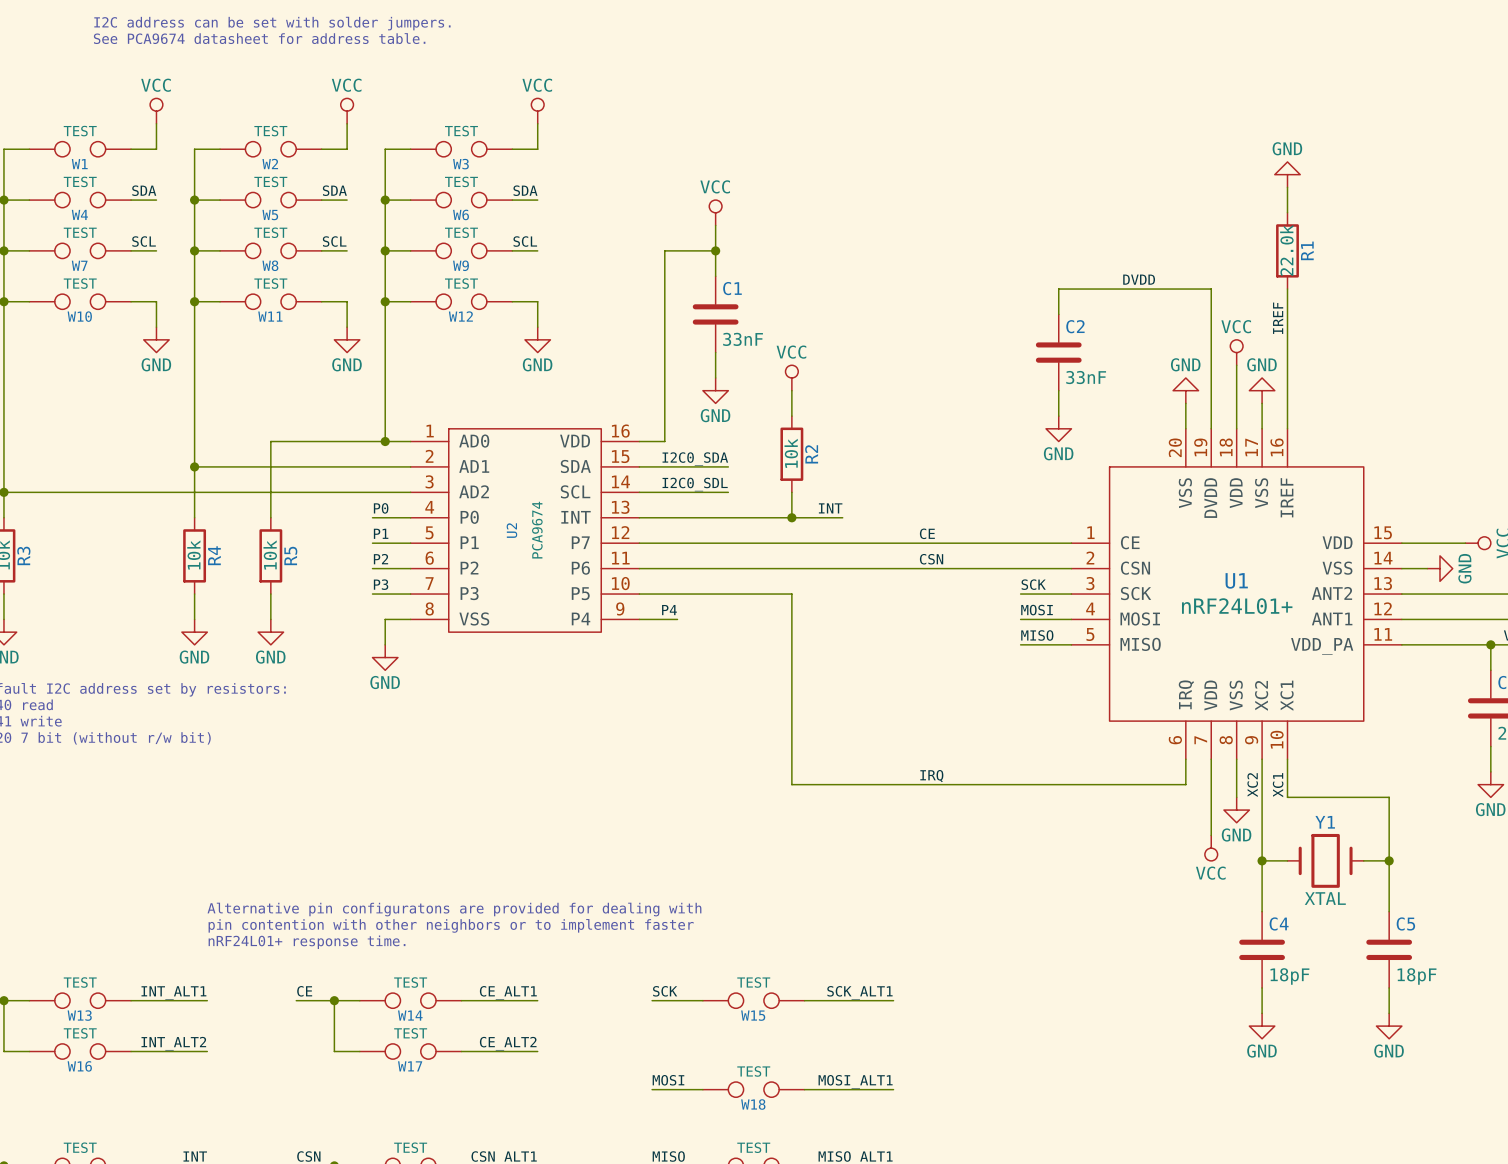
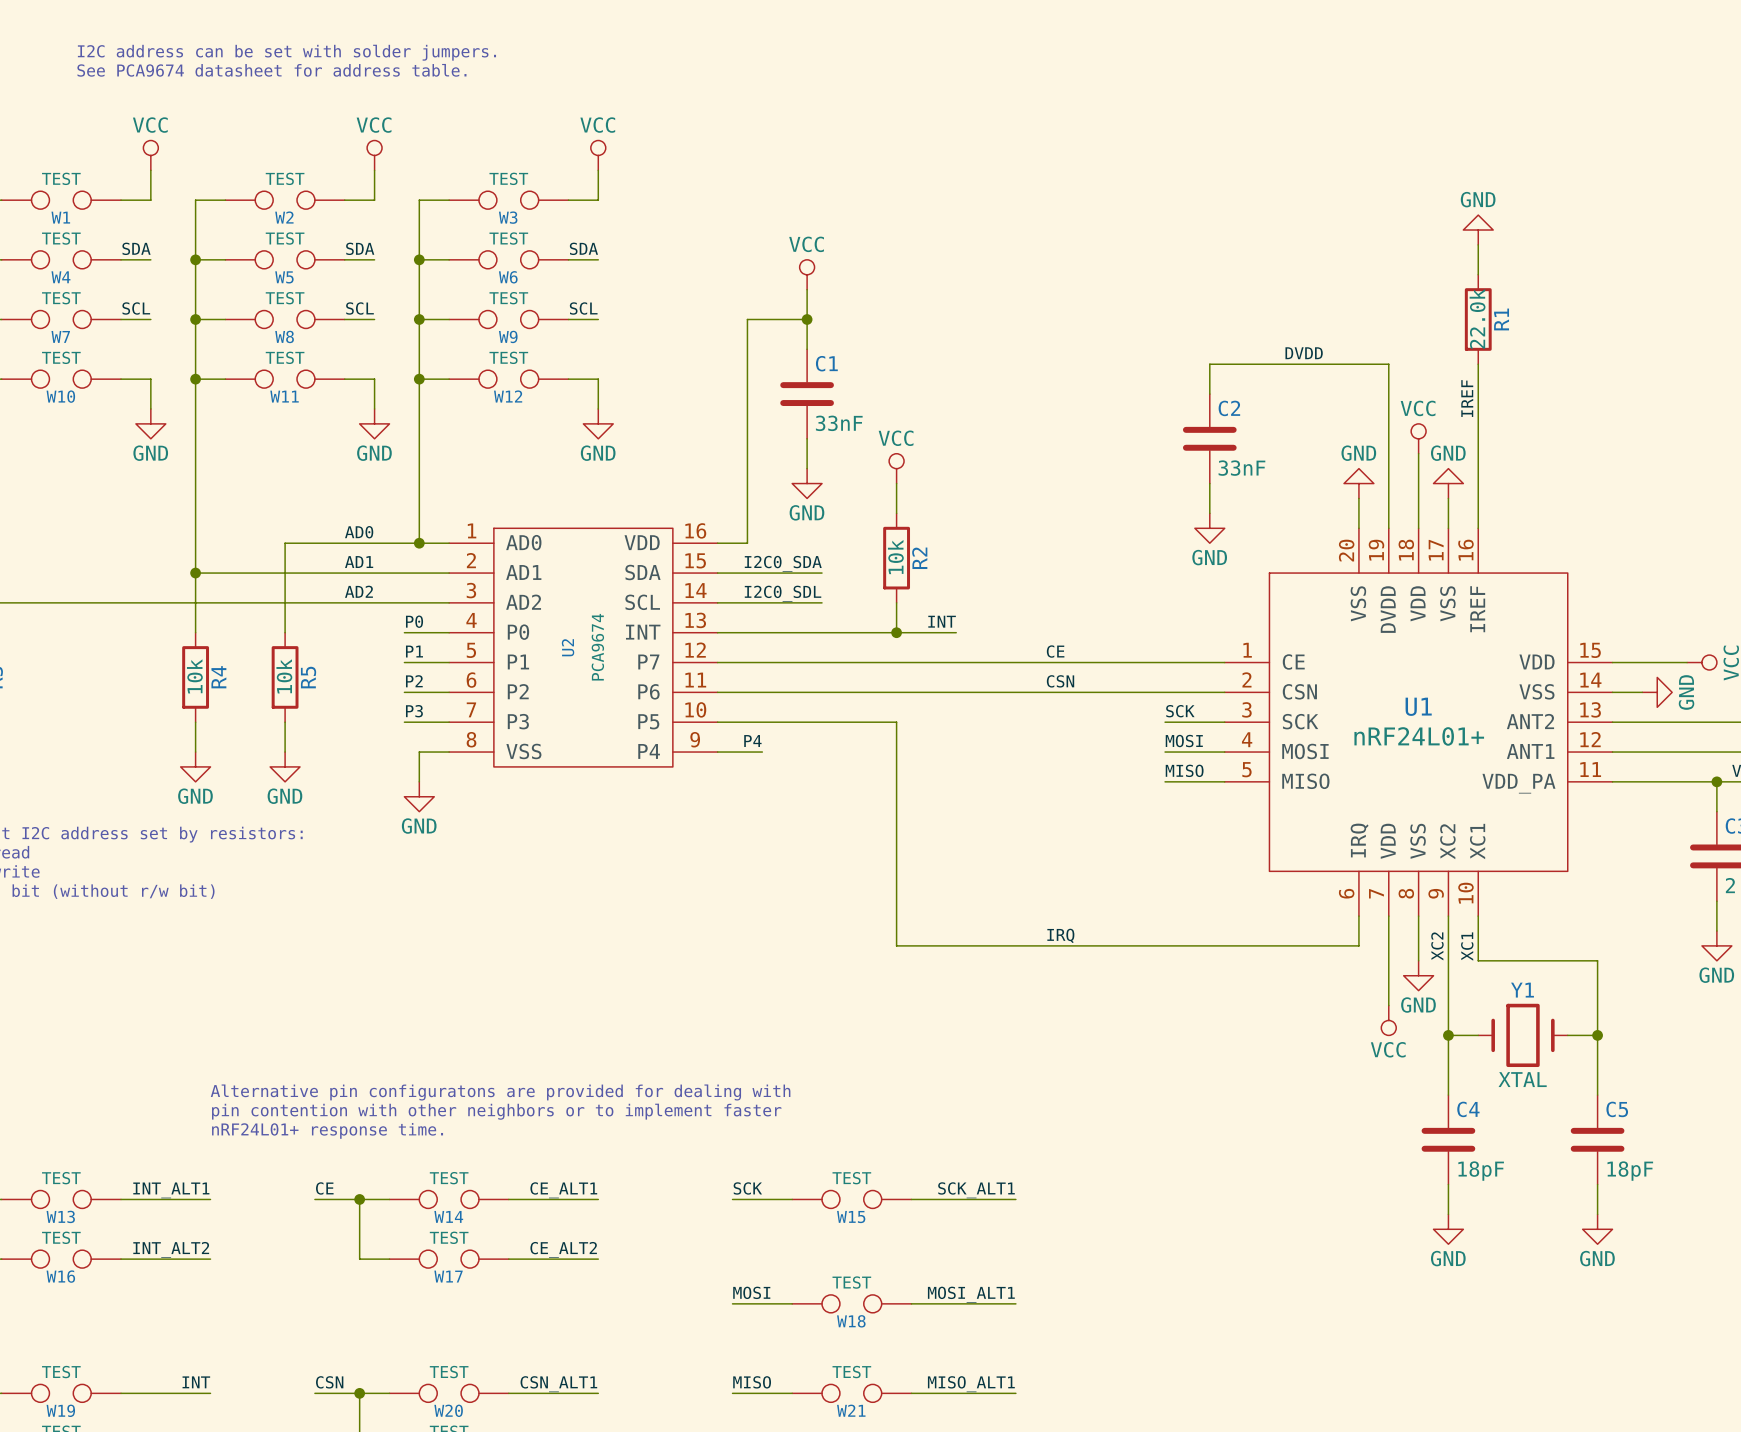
label: none -> AD0 (359, 532)
label: none -> AD1 (359, 562)
label: none -> AD2 (358, 591)

